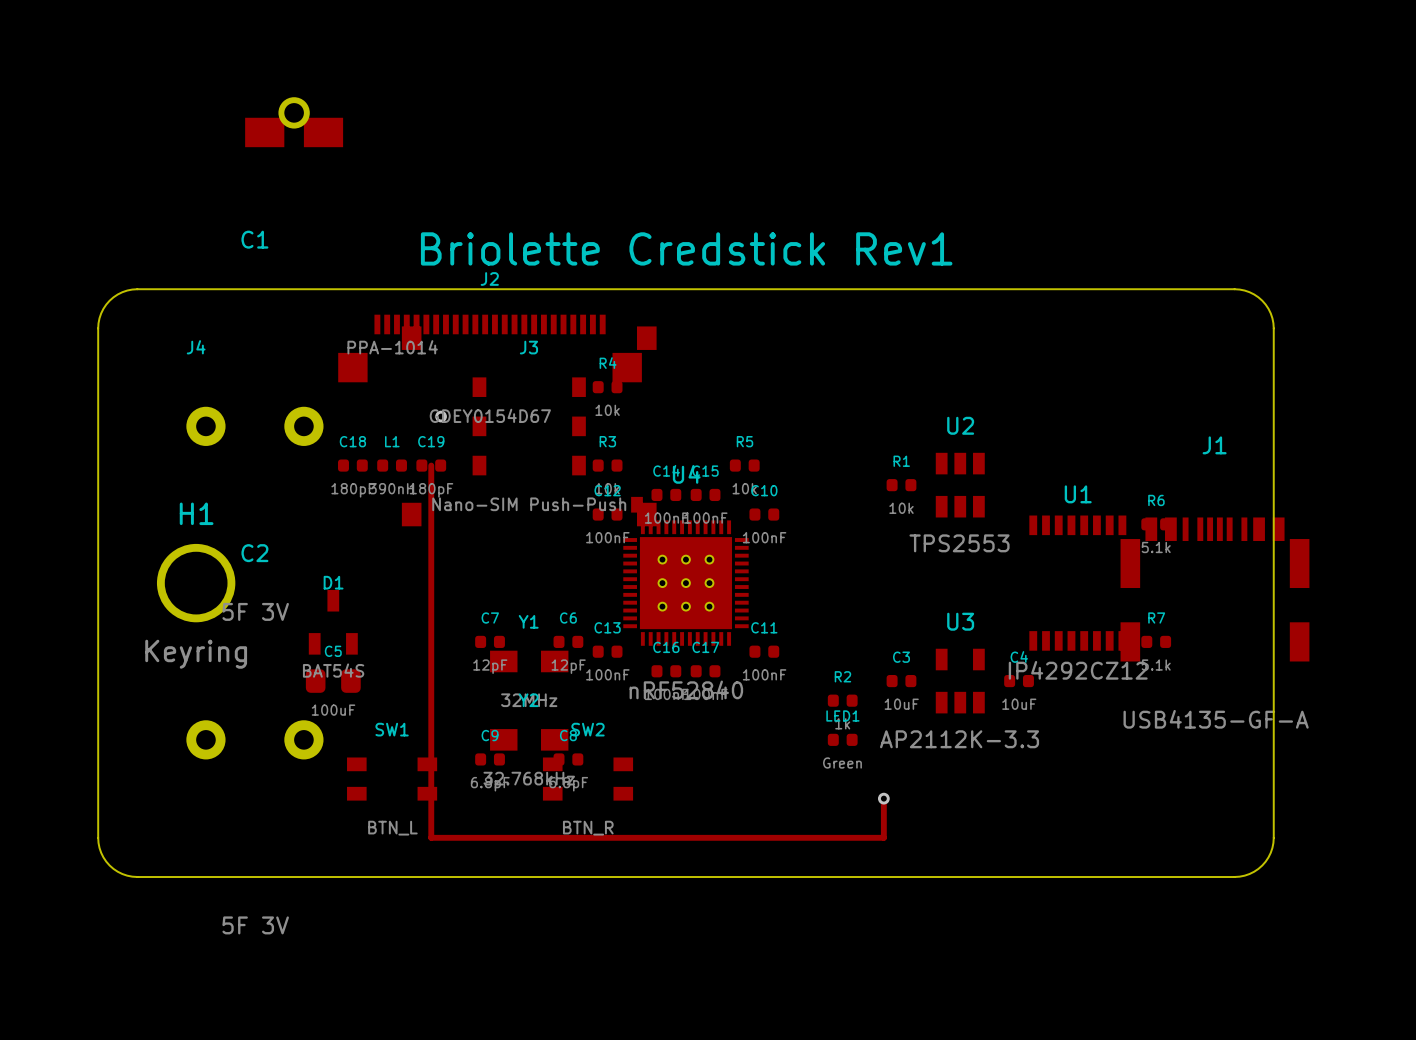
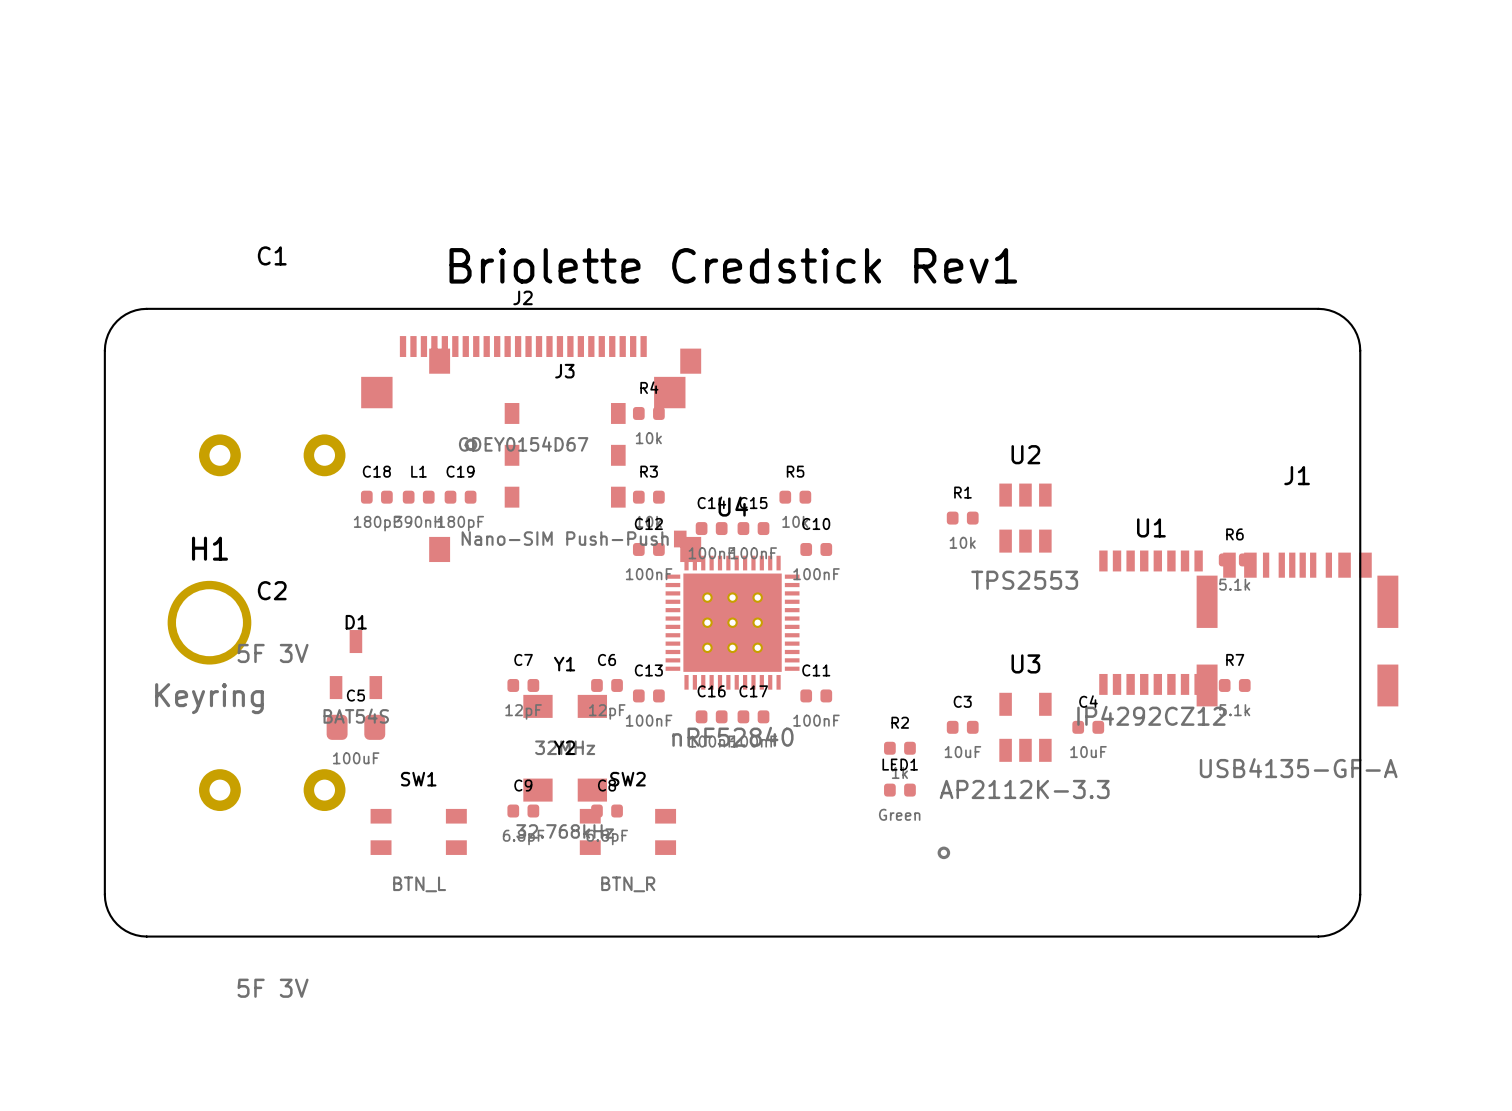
J4: PPA-1014 (294, 122) -> none
track: (431, 465) (431, 837) (883, 837) (883, 798) -> none

